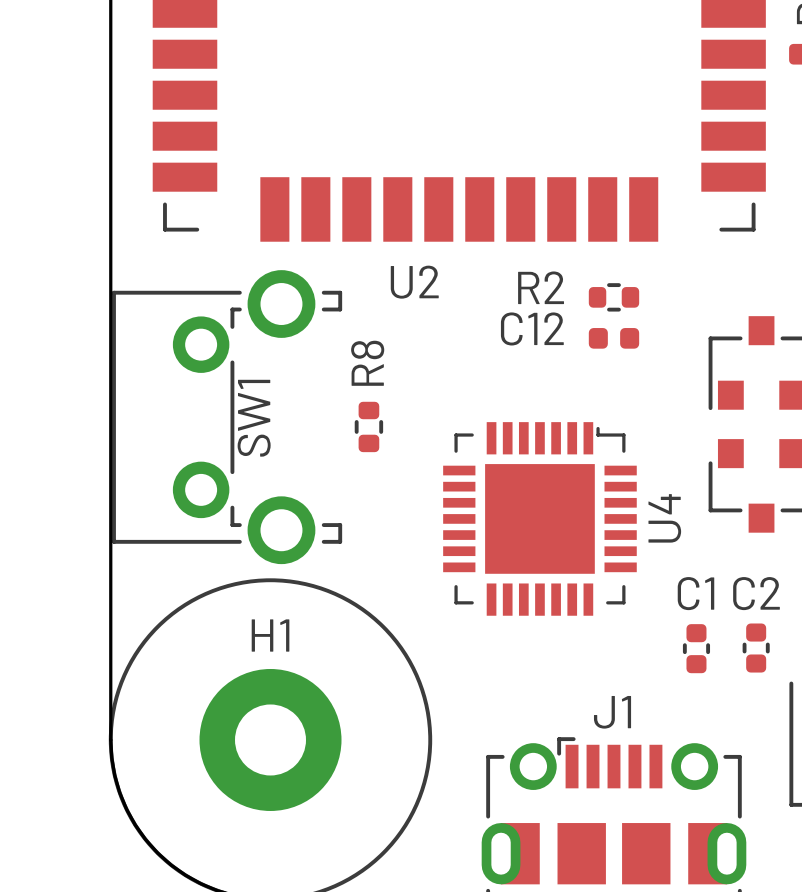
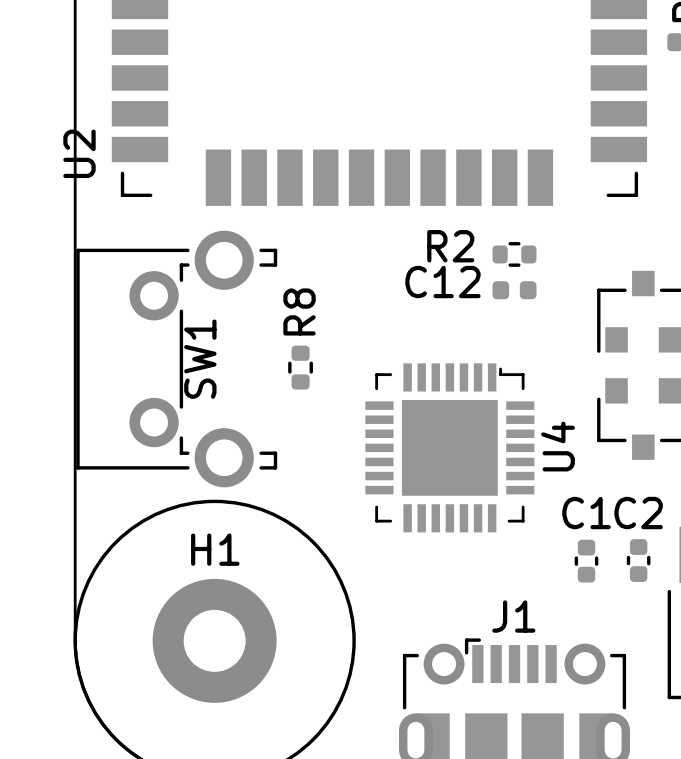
U2 name rotation: 0° (414, 282) -> 90° counterclockwise (79, 153)
U2 name position: U2 (414, 282) -> U2 (79, 153)

